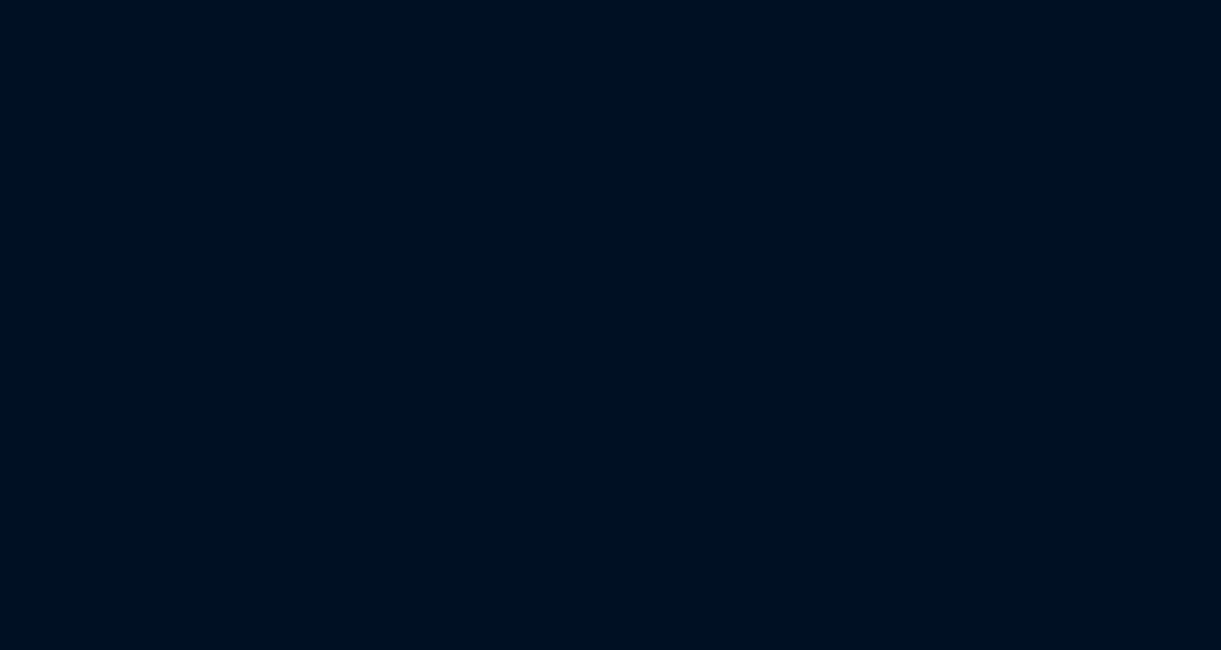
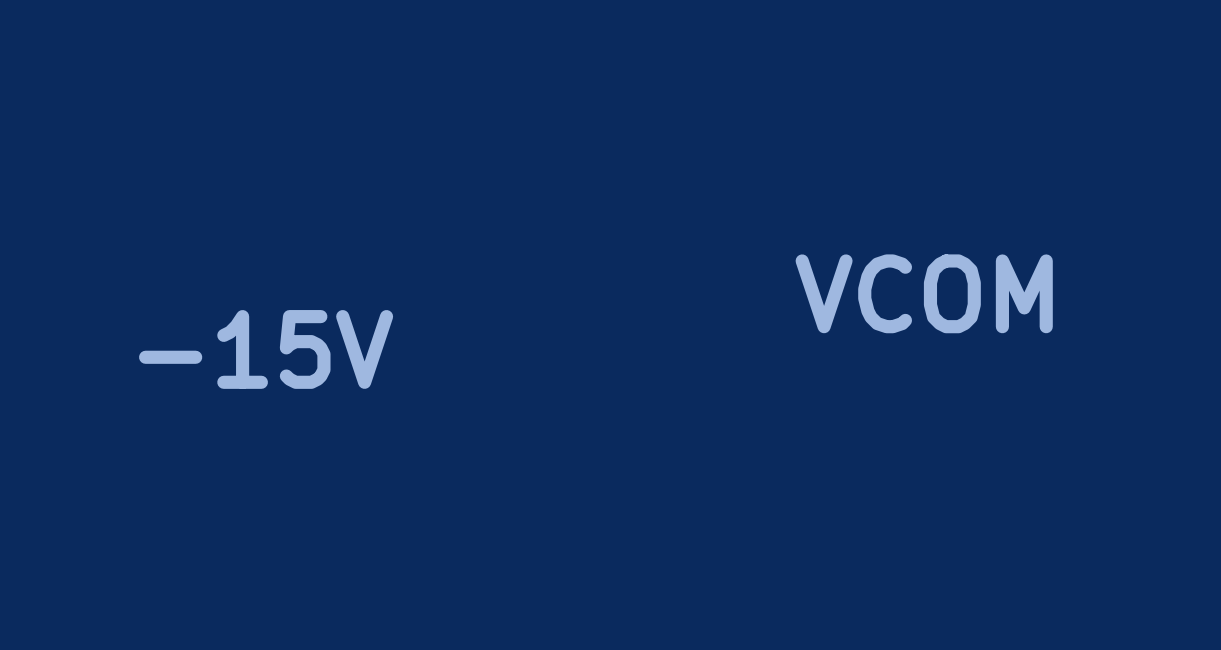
text: none -> VCOM (924, 293)
text: none -> -15V (266, 349)

